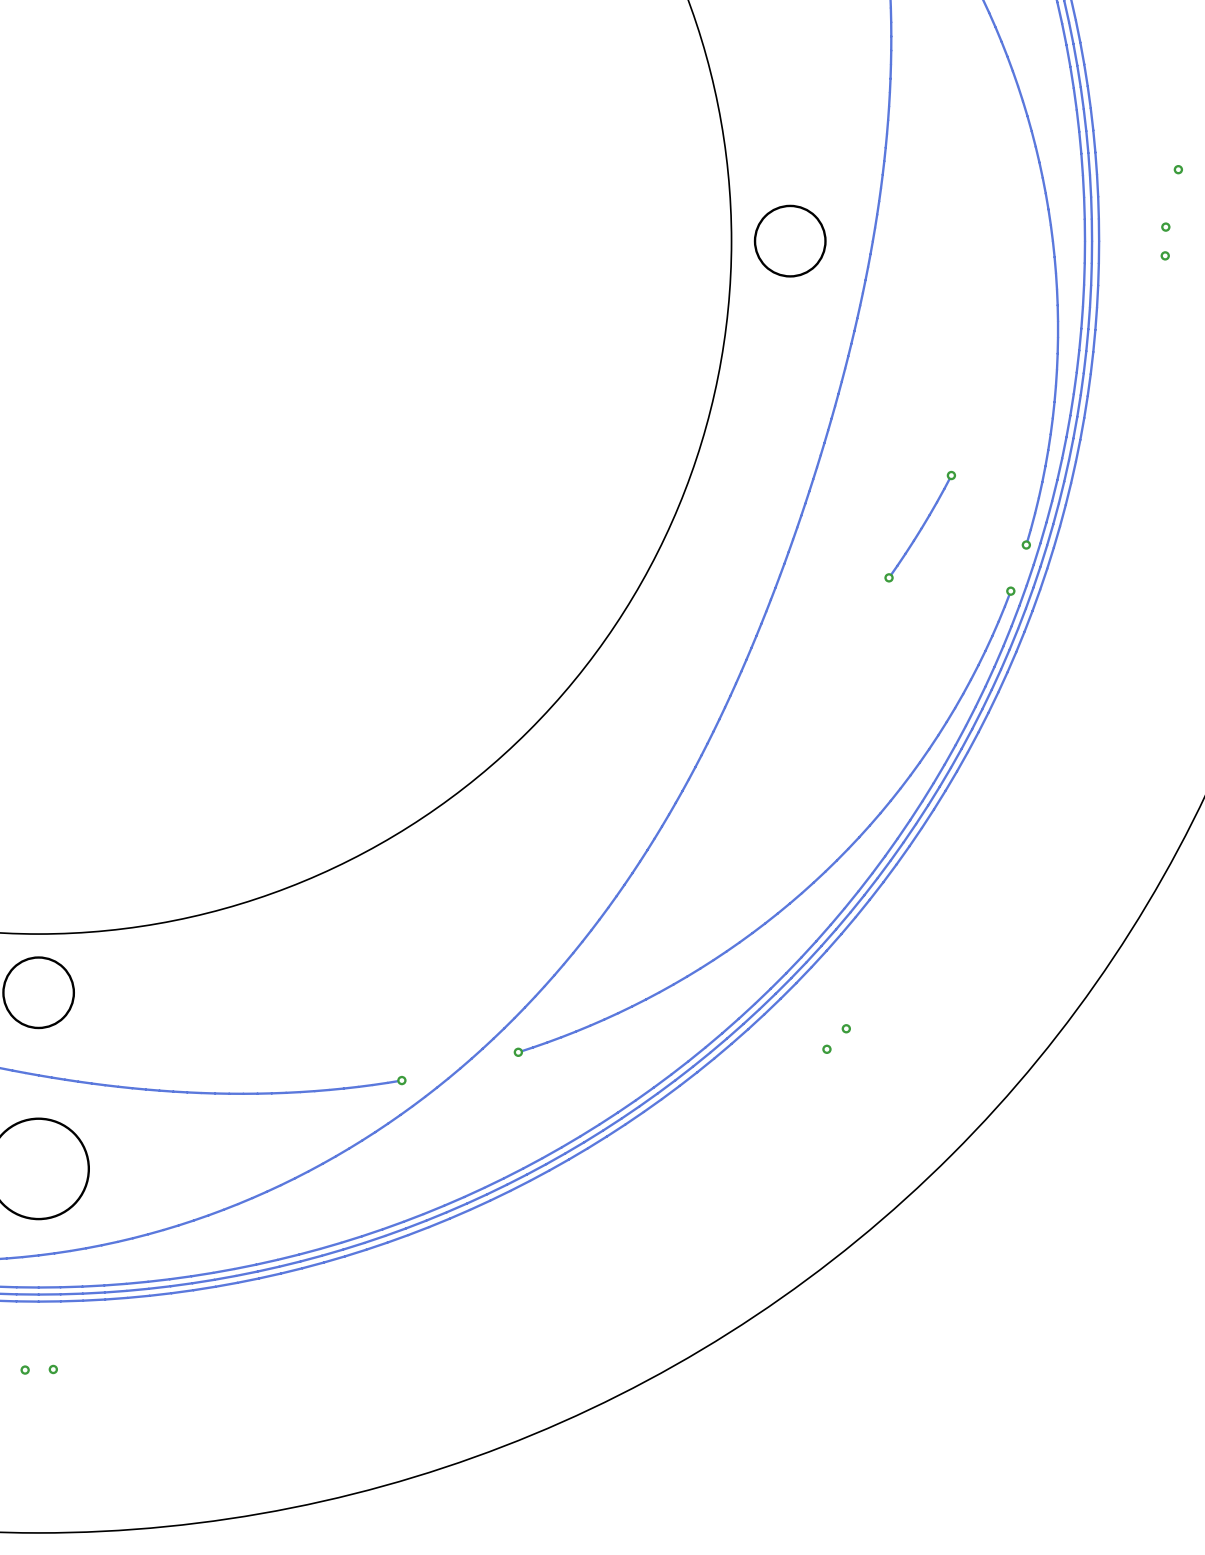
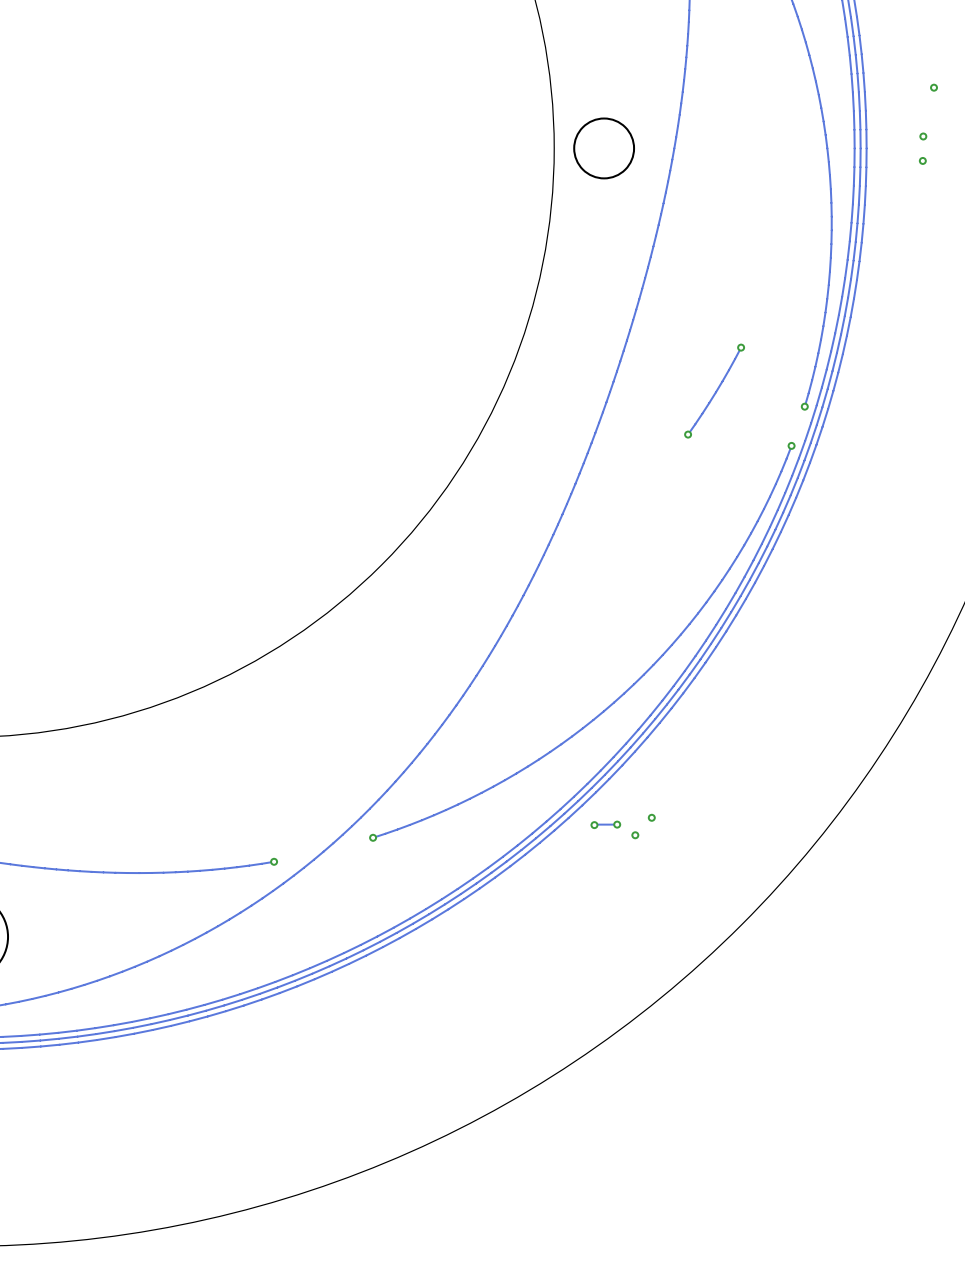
track: none -> (617, 824) (594, 825)
via: none -> (617, 824)
via: none -> (594, 825)

